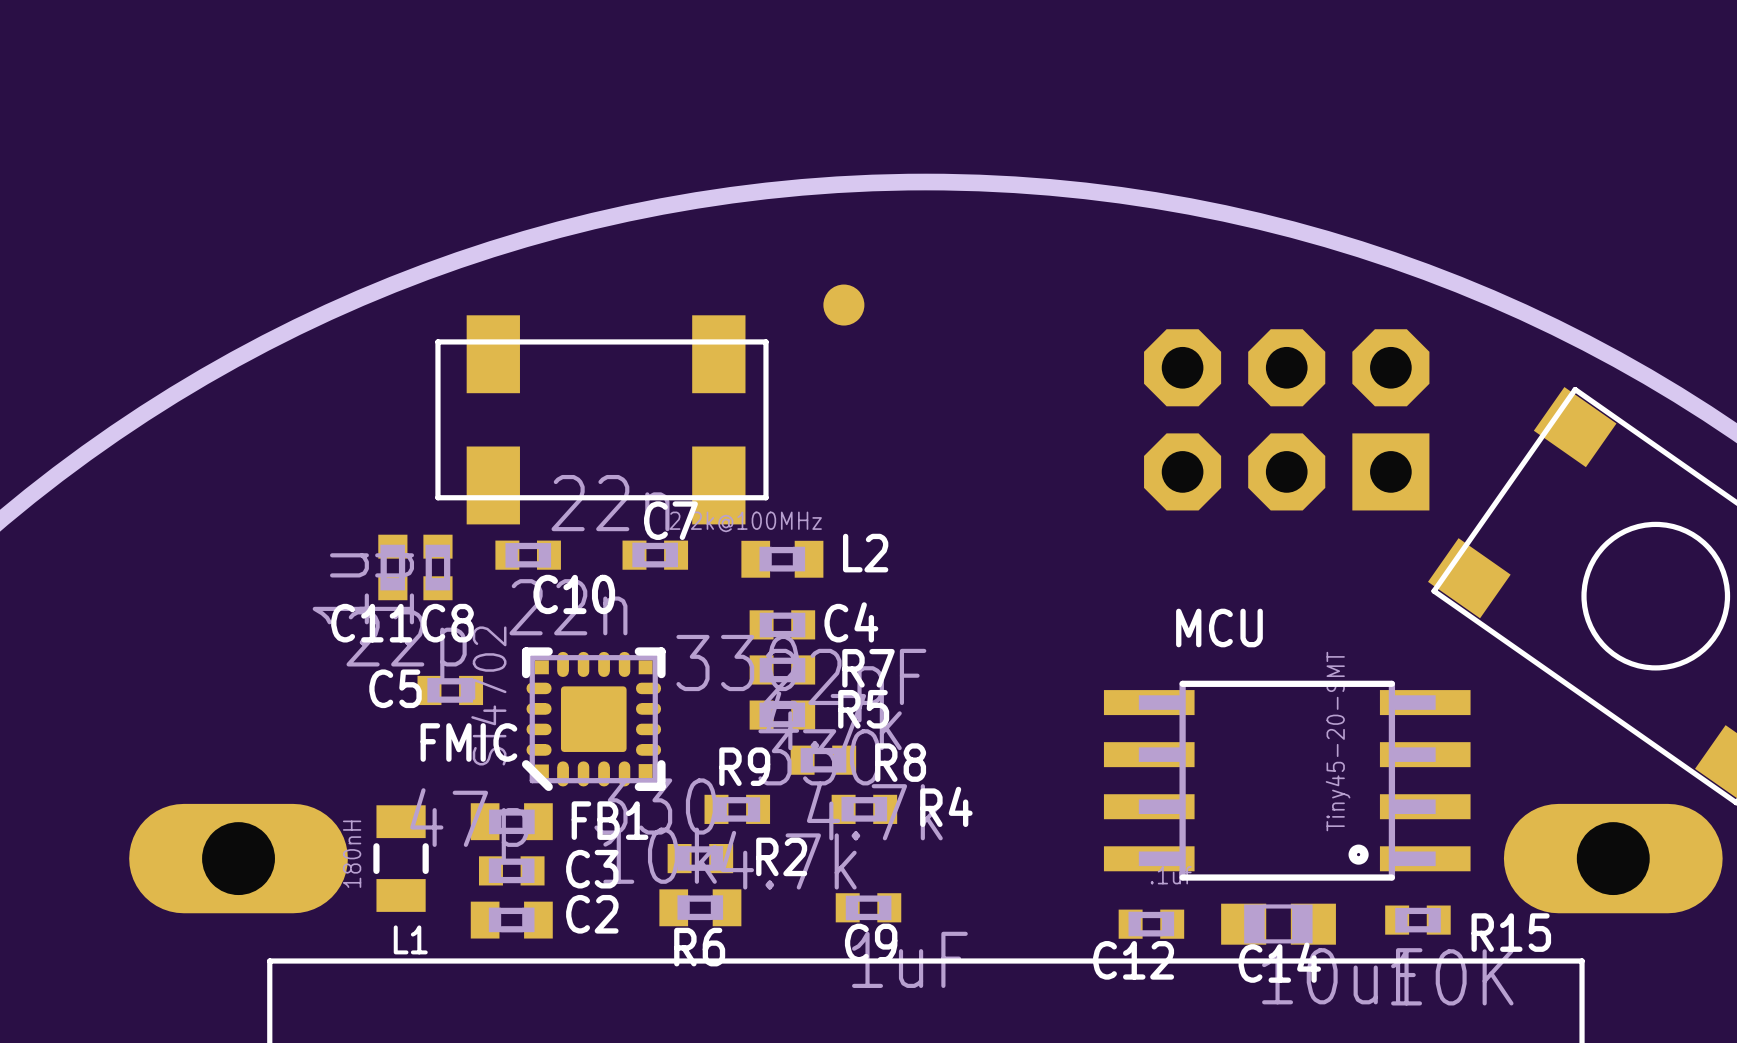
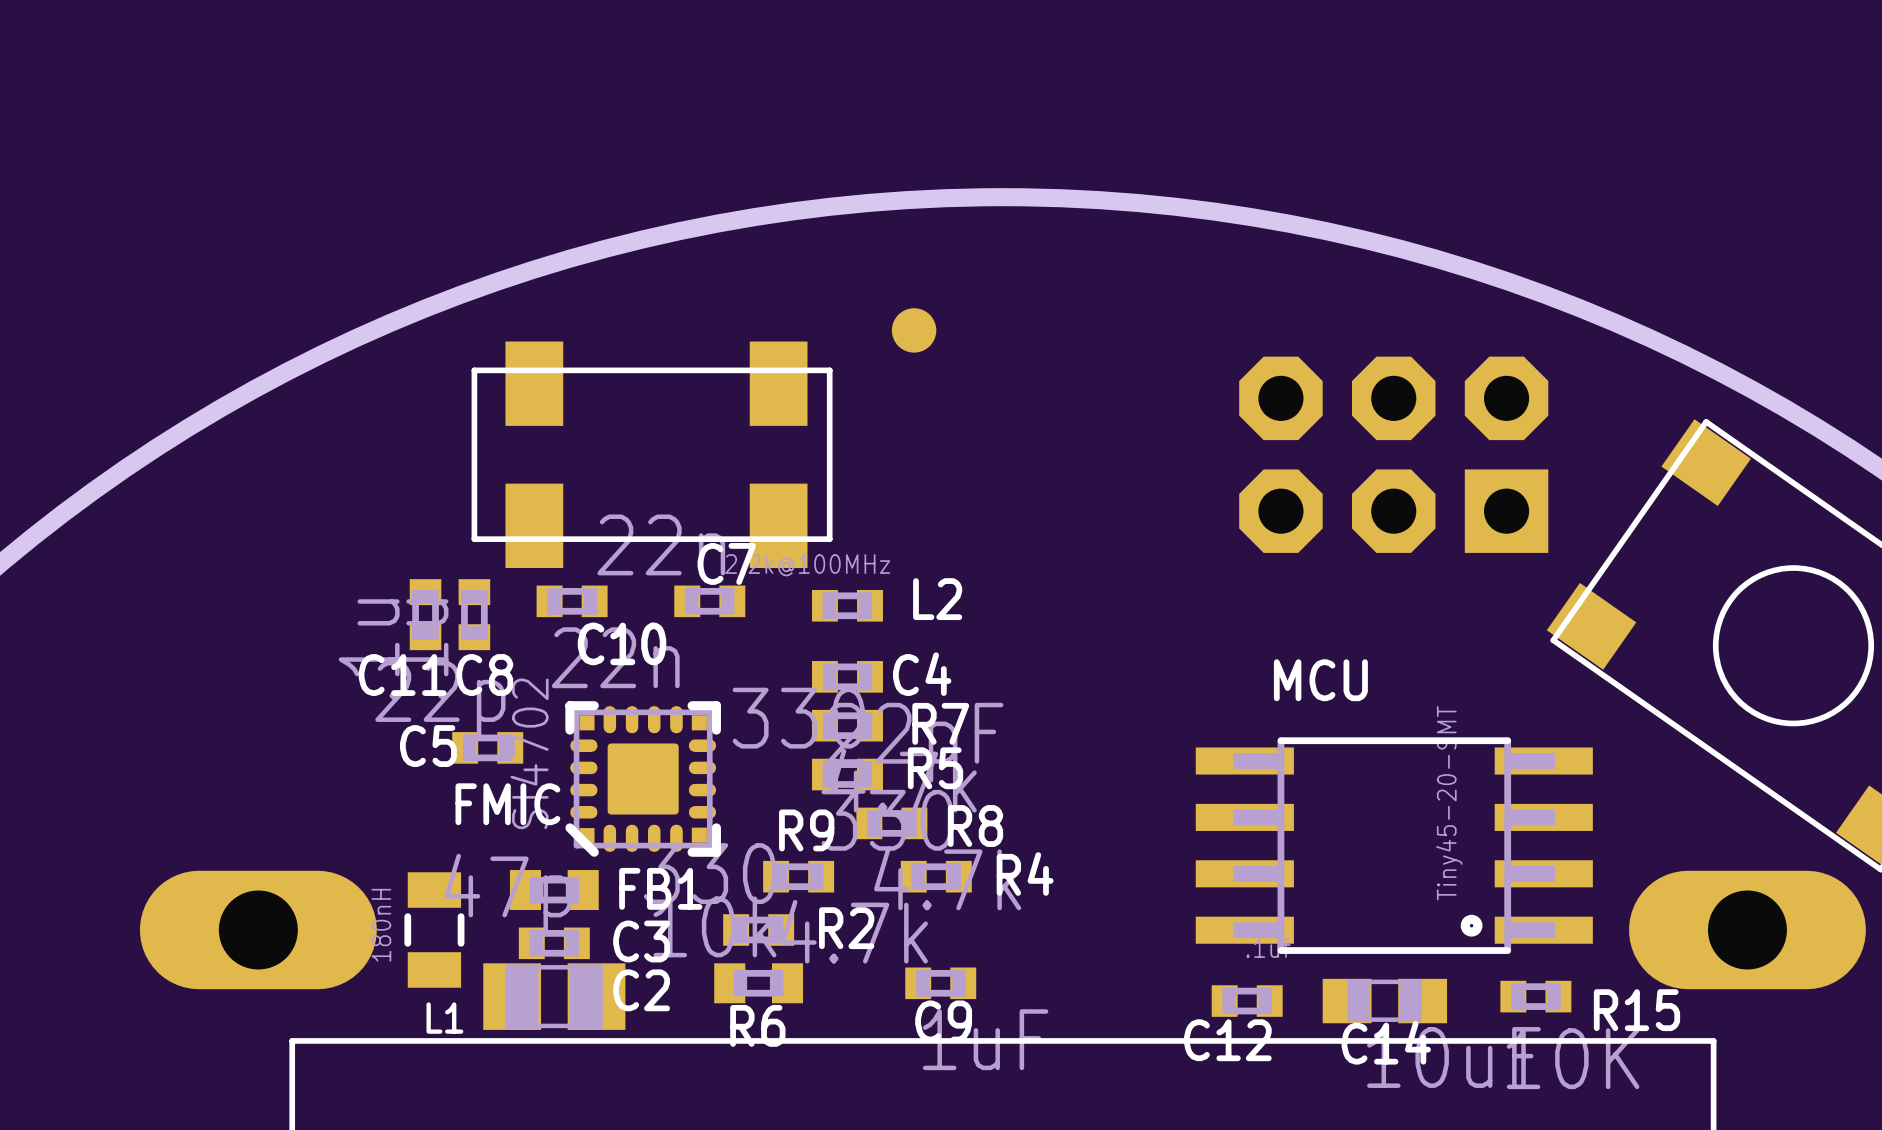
L2 footprint: [741, 540, 824, 578] -> [811, 589, 883, 622]
C2 footprint: [470, 901, 553, 939] -> [483, 963, 626, 1030]

